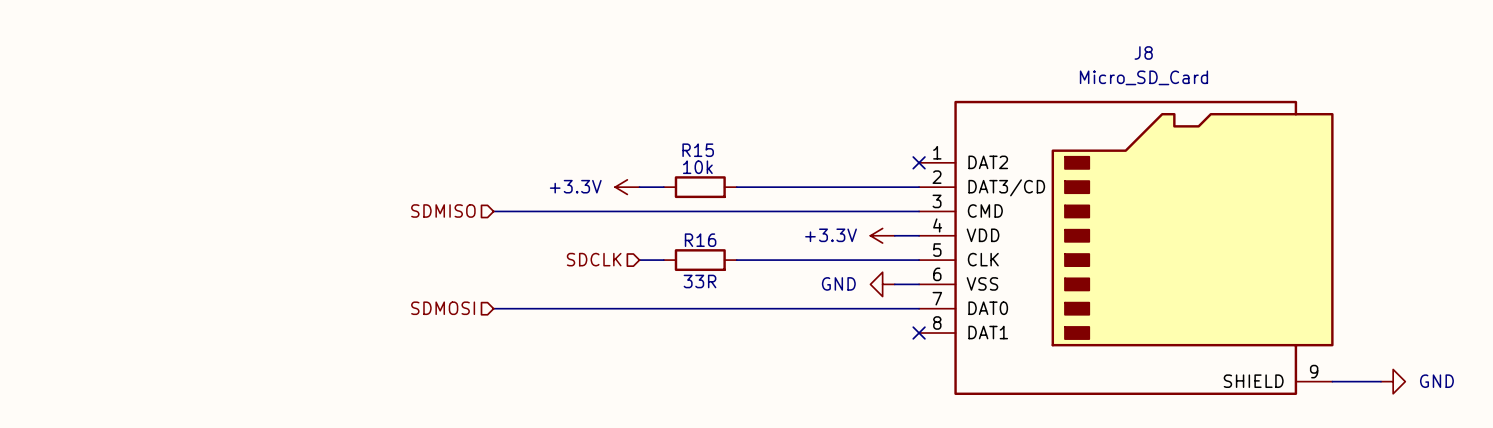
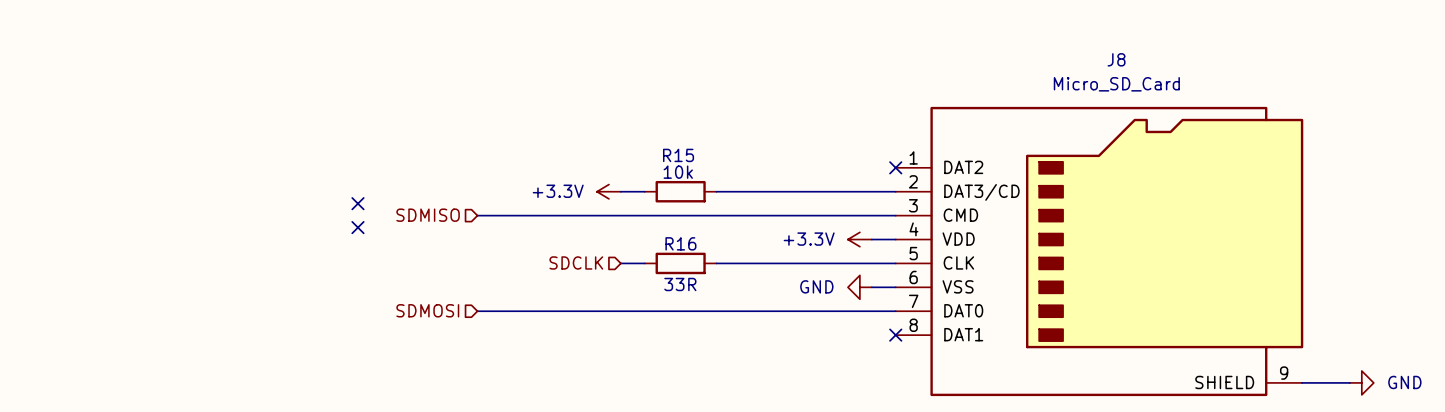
no-connect mark: none -> (357, 203)
no-connect mark: none -> (357, 227)

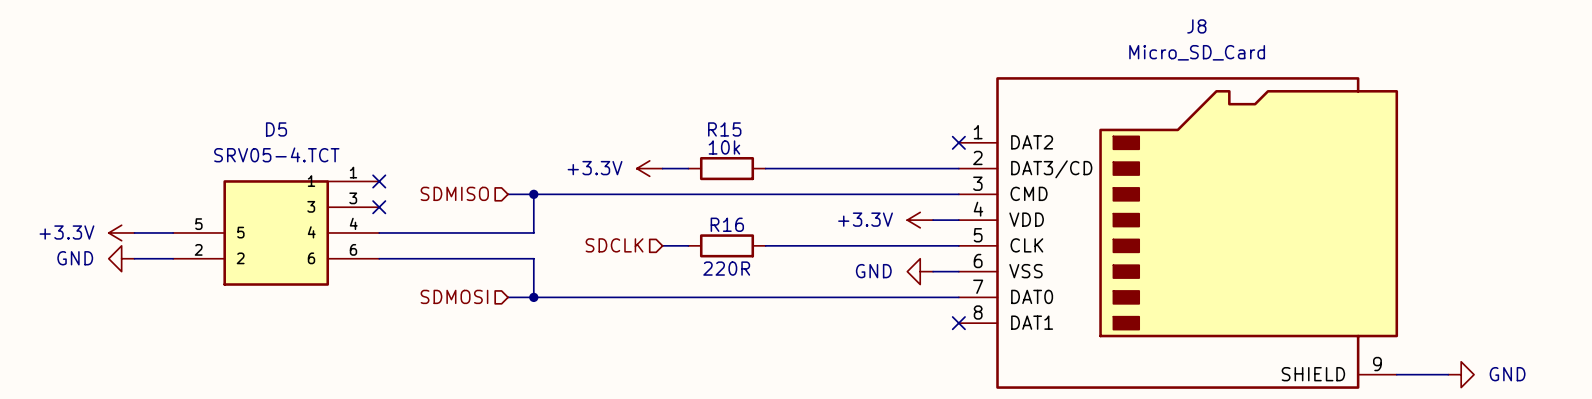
wire: none -> (533, 194) (533, 232) (379, 232)
junction: none -> (533, 194)
power symbol: none -> +3.3V (121, 232)
wire: none -> (134, 232) (173, 232)
D5: none -> SRV05-4.TCT (276, 232)
power symbol: none -> GND (121, 258)
wire: none -> (134, 258) (173, 258)
wire: none -> (379, 258) (533, 258) (533, 297)
R16 value: 33R (680, 284) -> 220R (726, 268)
junction: none -> (533, 297)

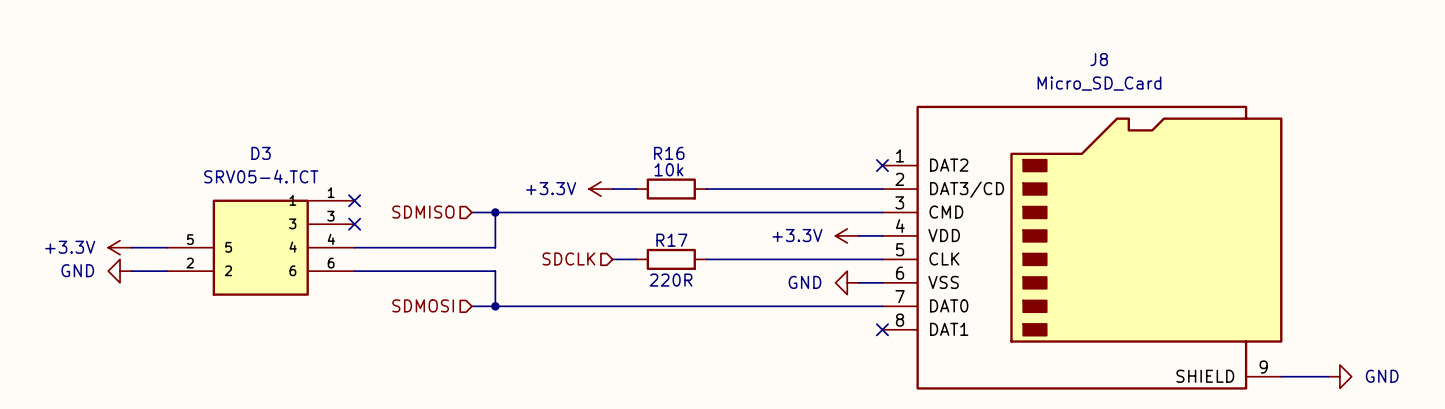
D5 name: D5 (276, 129) -> D3 (261, 153)
R15 name: R15 (724, 129) -> R16 (669, 153)
R16 name: R16 (727, 224) -> R17 (671, 240)

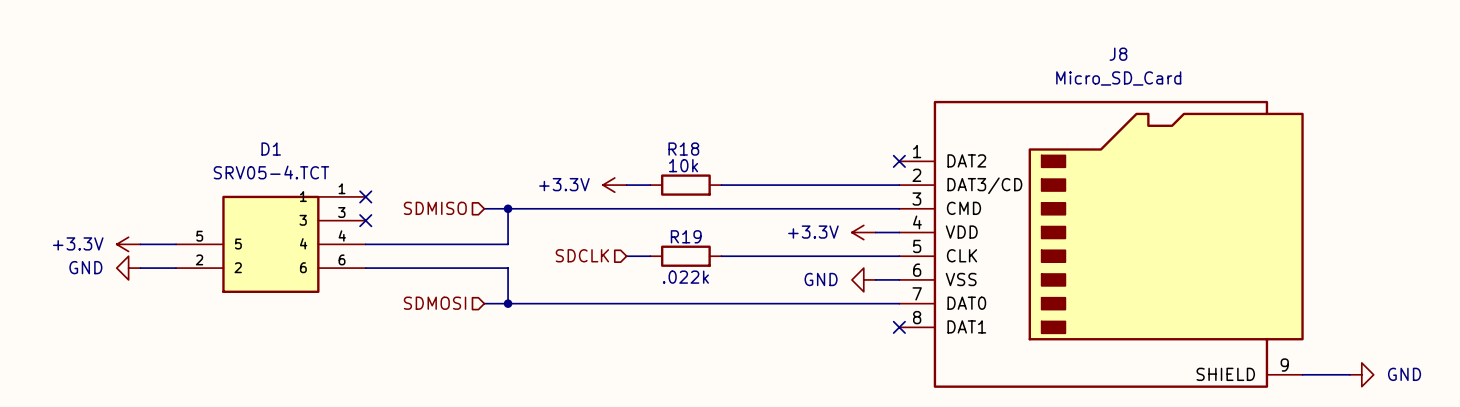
D3 name: D3 (261, 153) -> D1 (271, 149)
R16 name: R16 (669, 153) -> R18 (683, 149)
R17 name: R17 (671, 240) -> R19 (686, 236)
R17 value: 220R (671, 280) -> .022k (685, 277)

